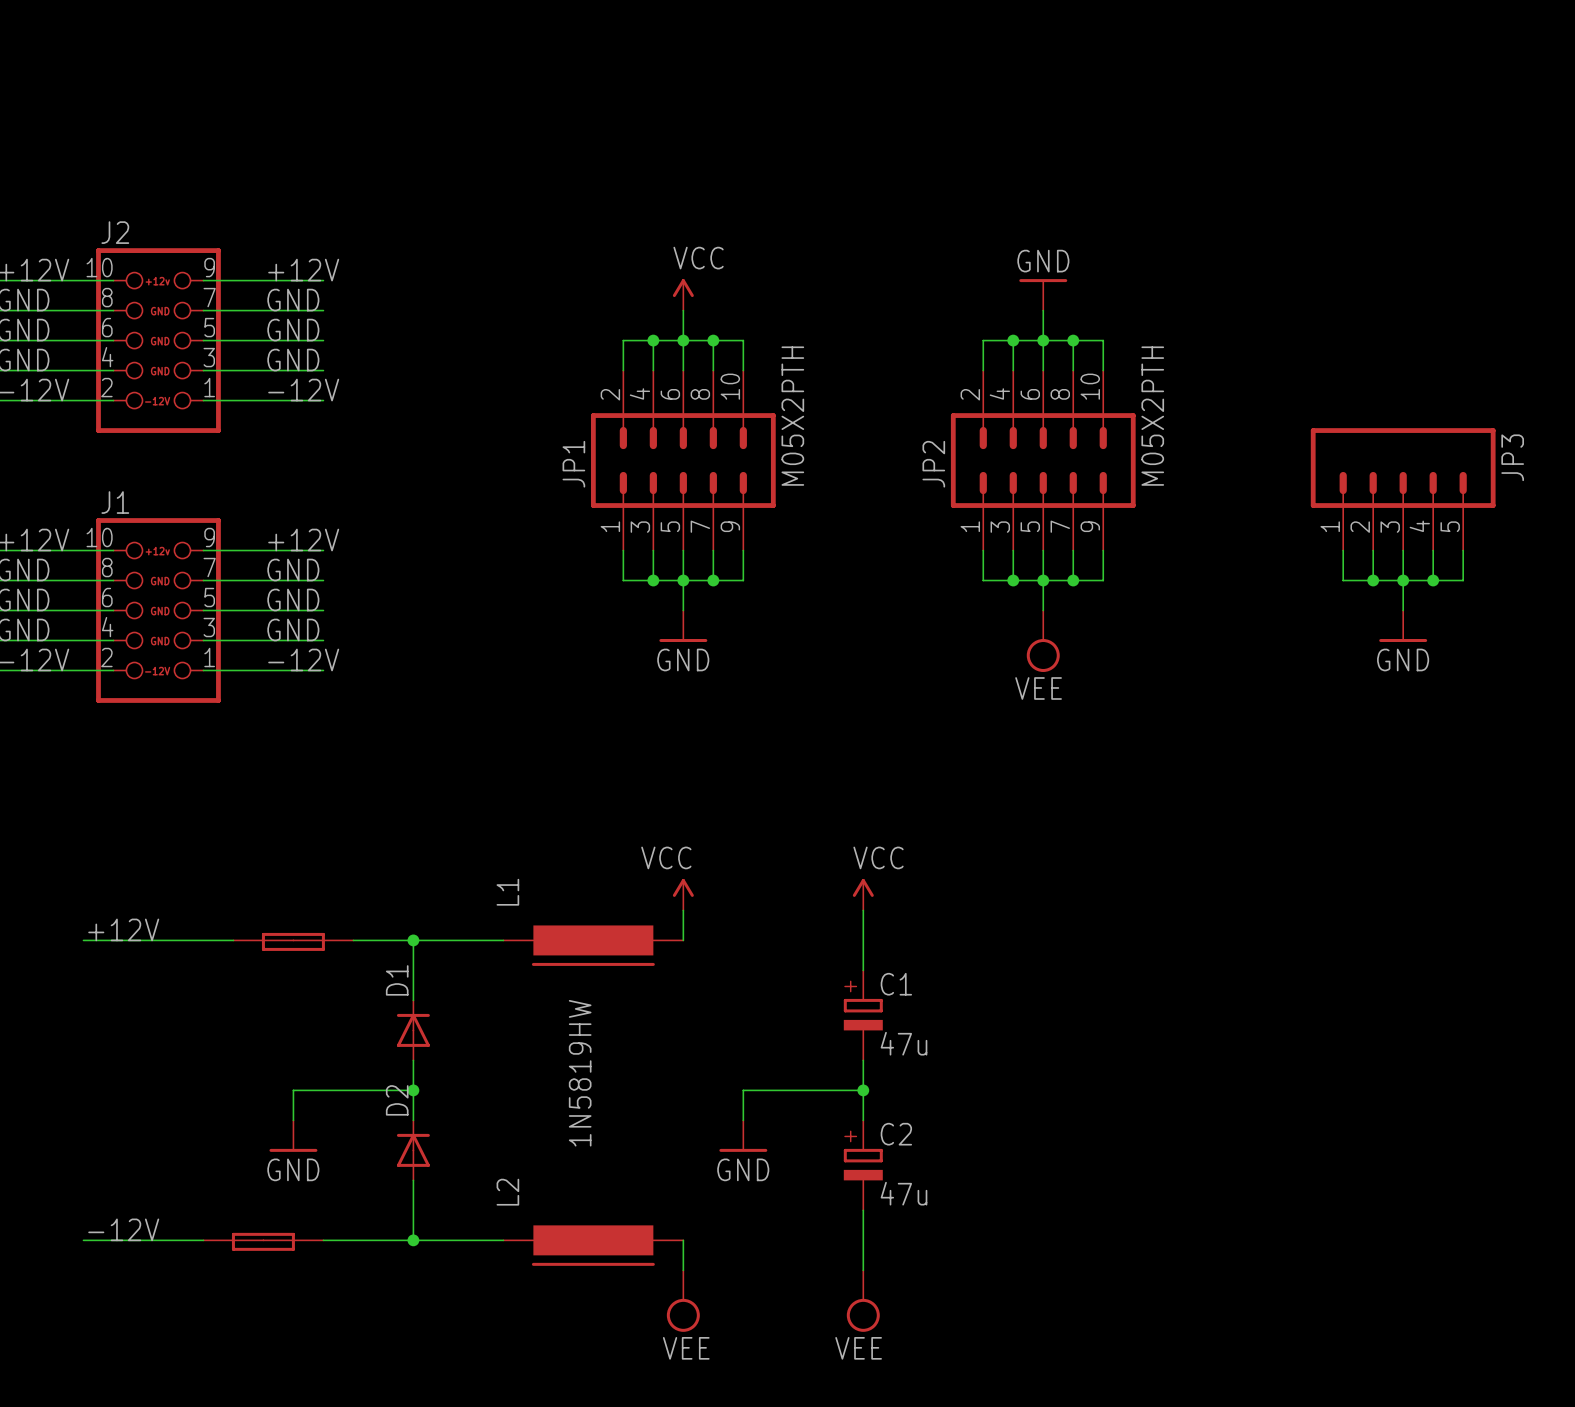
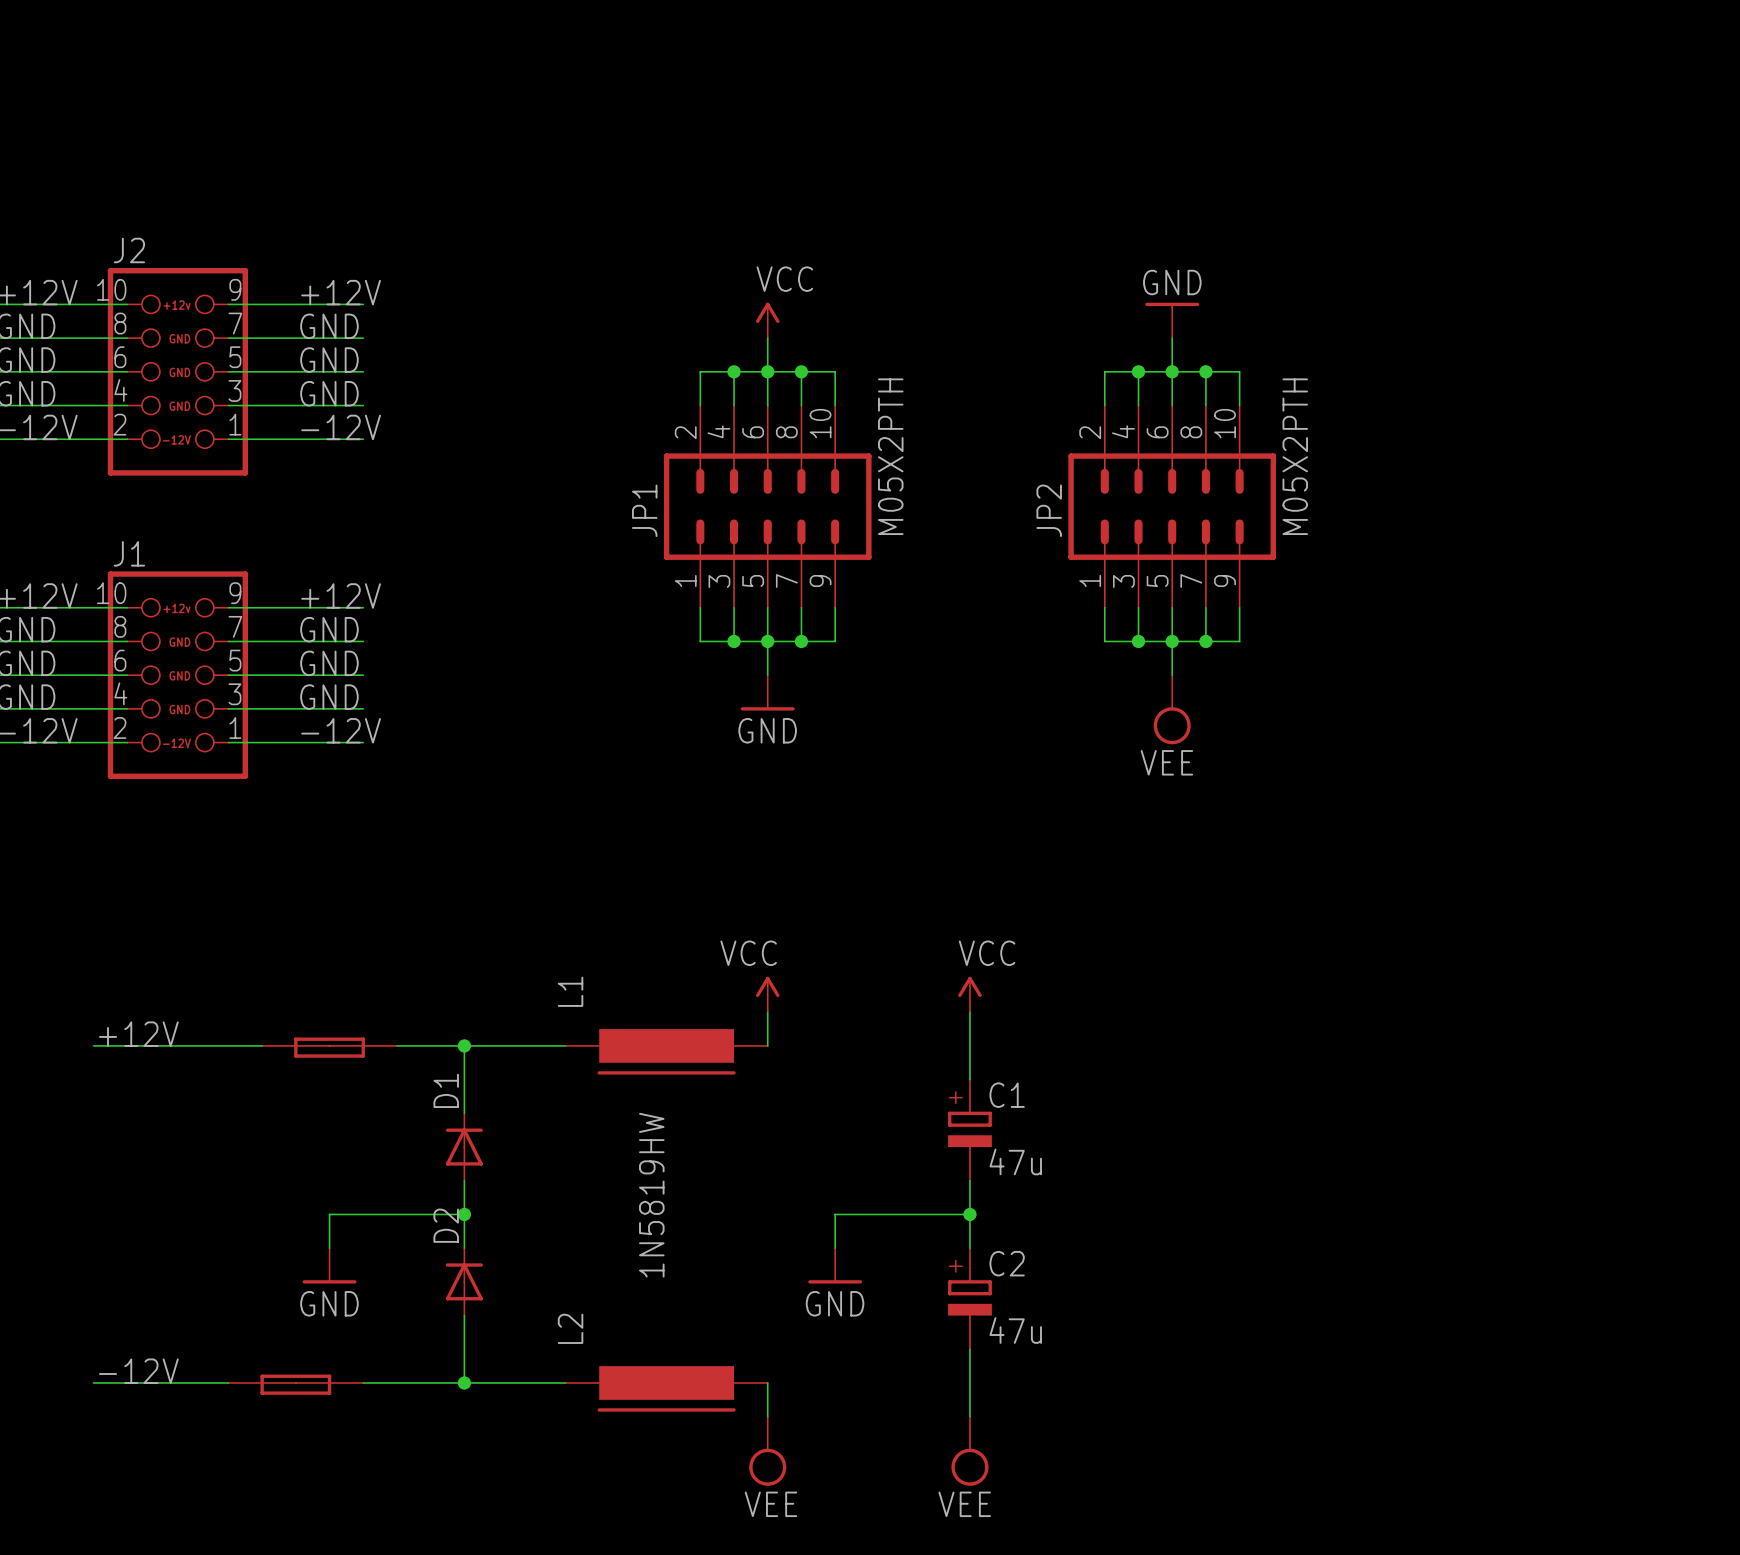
JP3: (1403, 489) -> none
wire: (1343, 550) (1343, 580) (1463, 580) (1463, 550) -> none
wire: (1373, 550) (1373, 580) -> none
wire: (1403, 550) (1403, 610) -> none
wire: (1433, 550) (1433, 580) -> none
junction: (1373, 580) -> none
junction: (1403, 580) -> none
junction: (1433, 580) -> none
power symbol: GND (1403, 626) -> none

